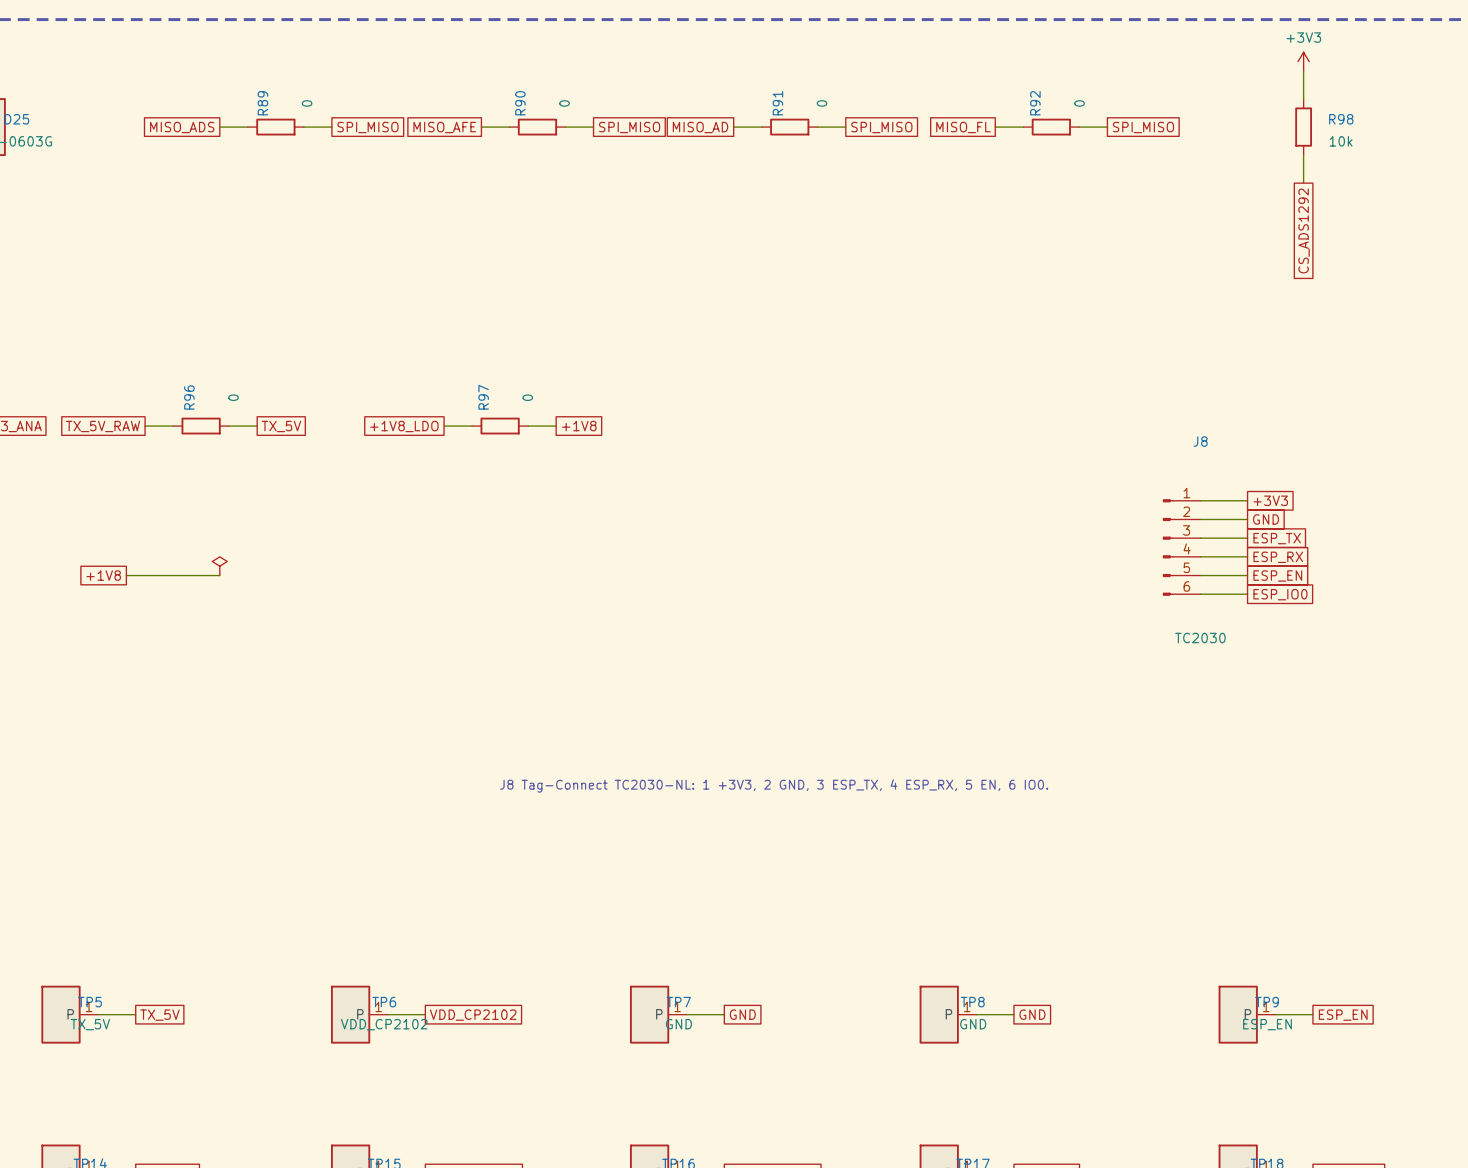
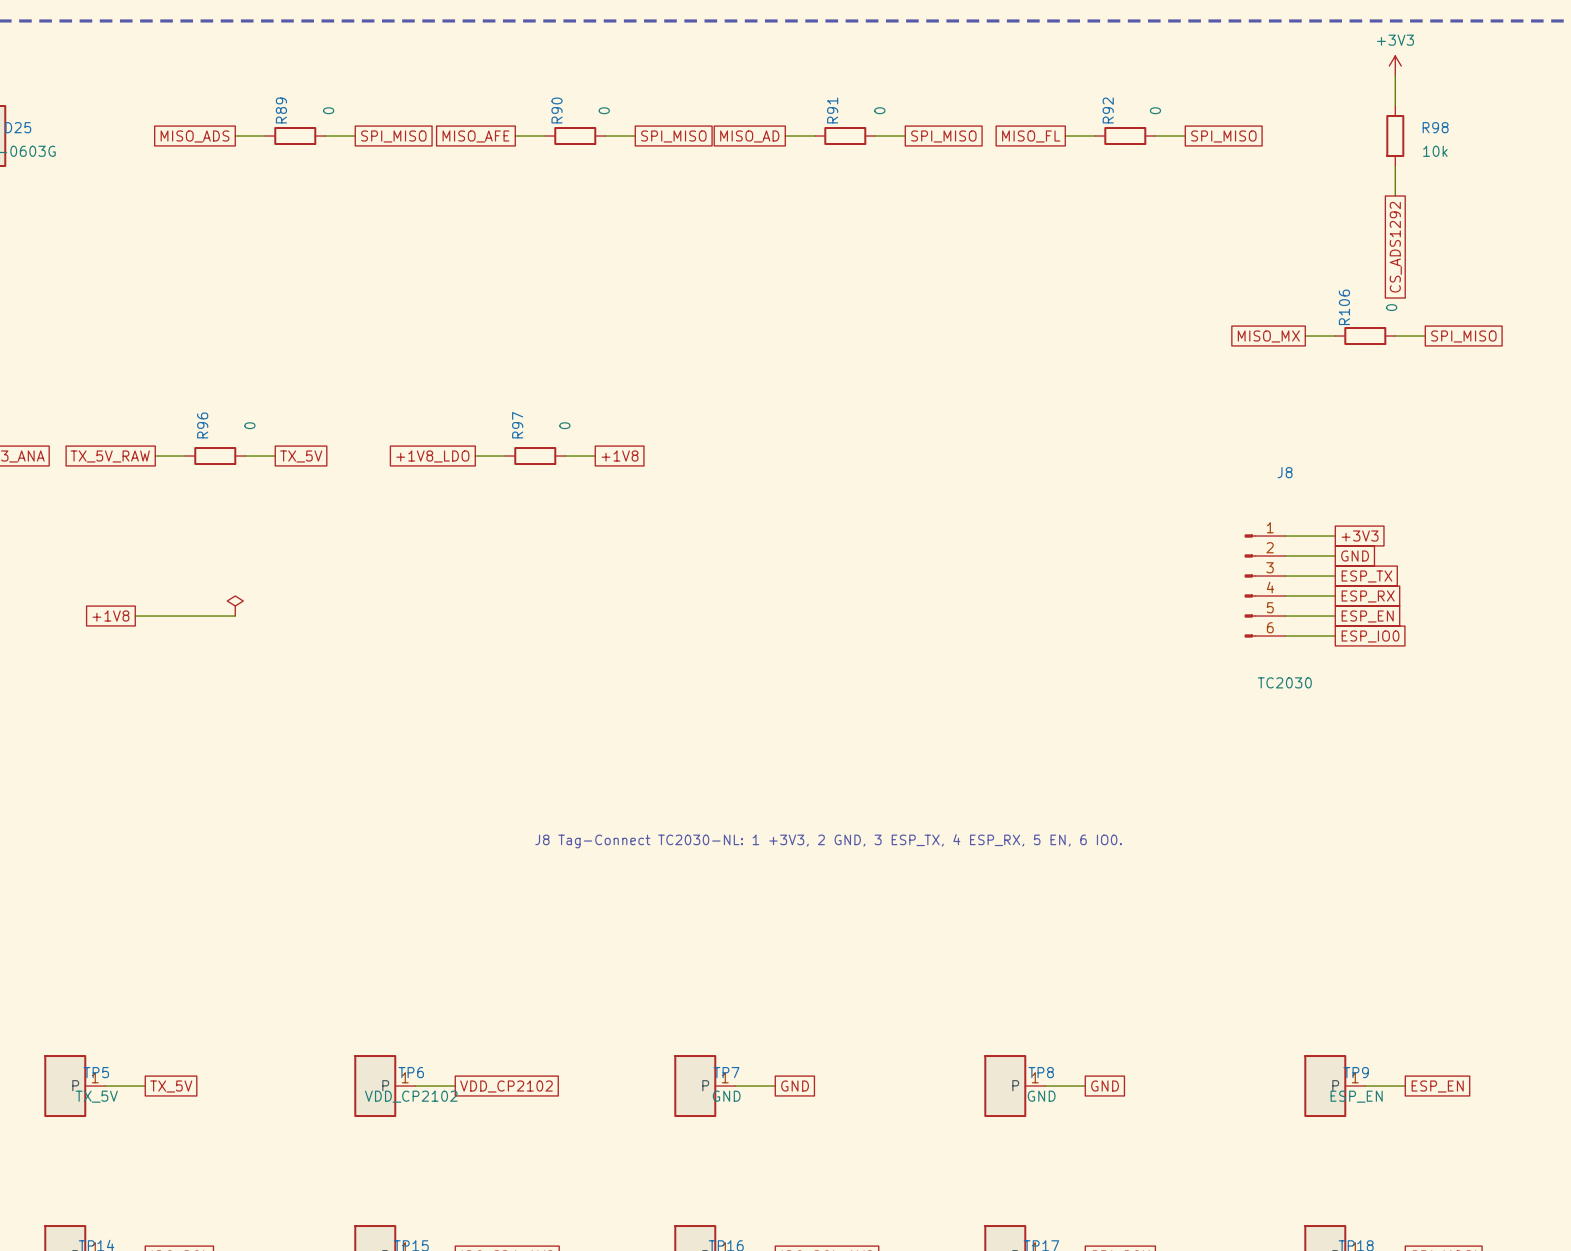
wire: none -> (1305, 336) (1335, 336)
R106: none -> 0 (1365, 336)
wire: none -> (1395, 336) (1425, 336)
global label: none -> MISO_MX (1268, 336)
global label: none -> SPI_MISO (1463, 336)

